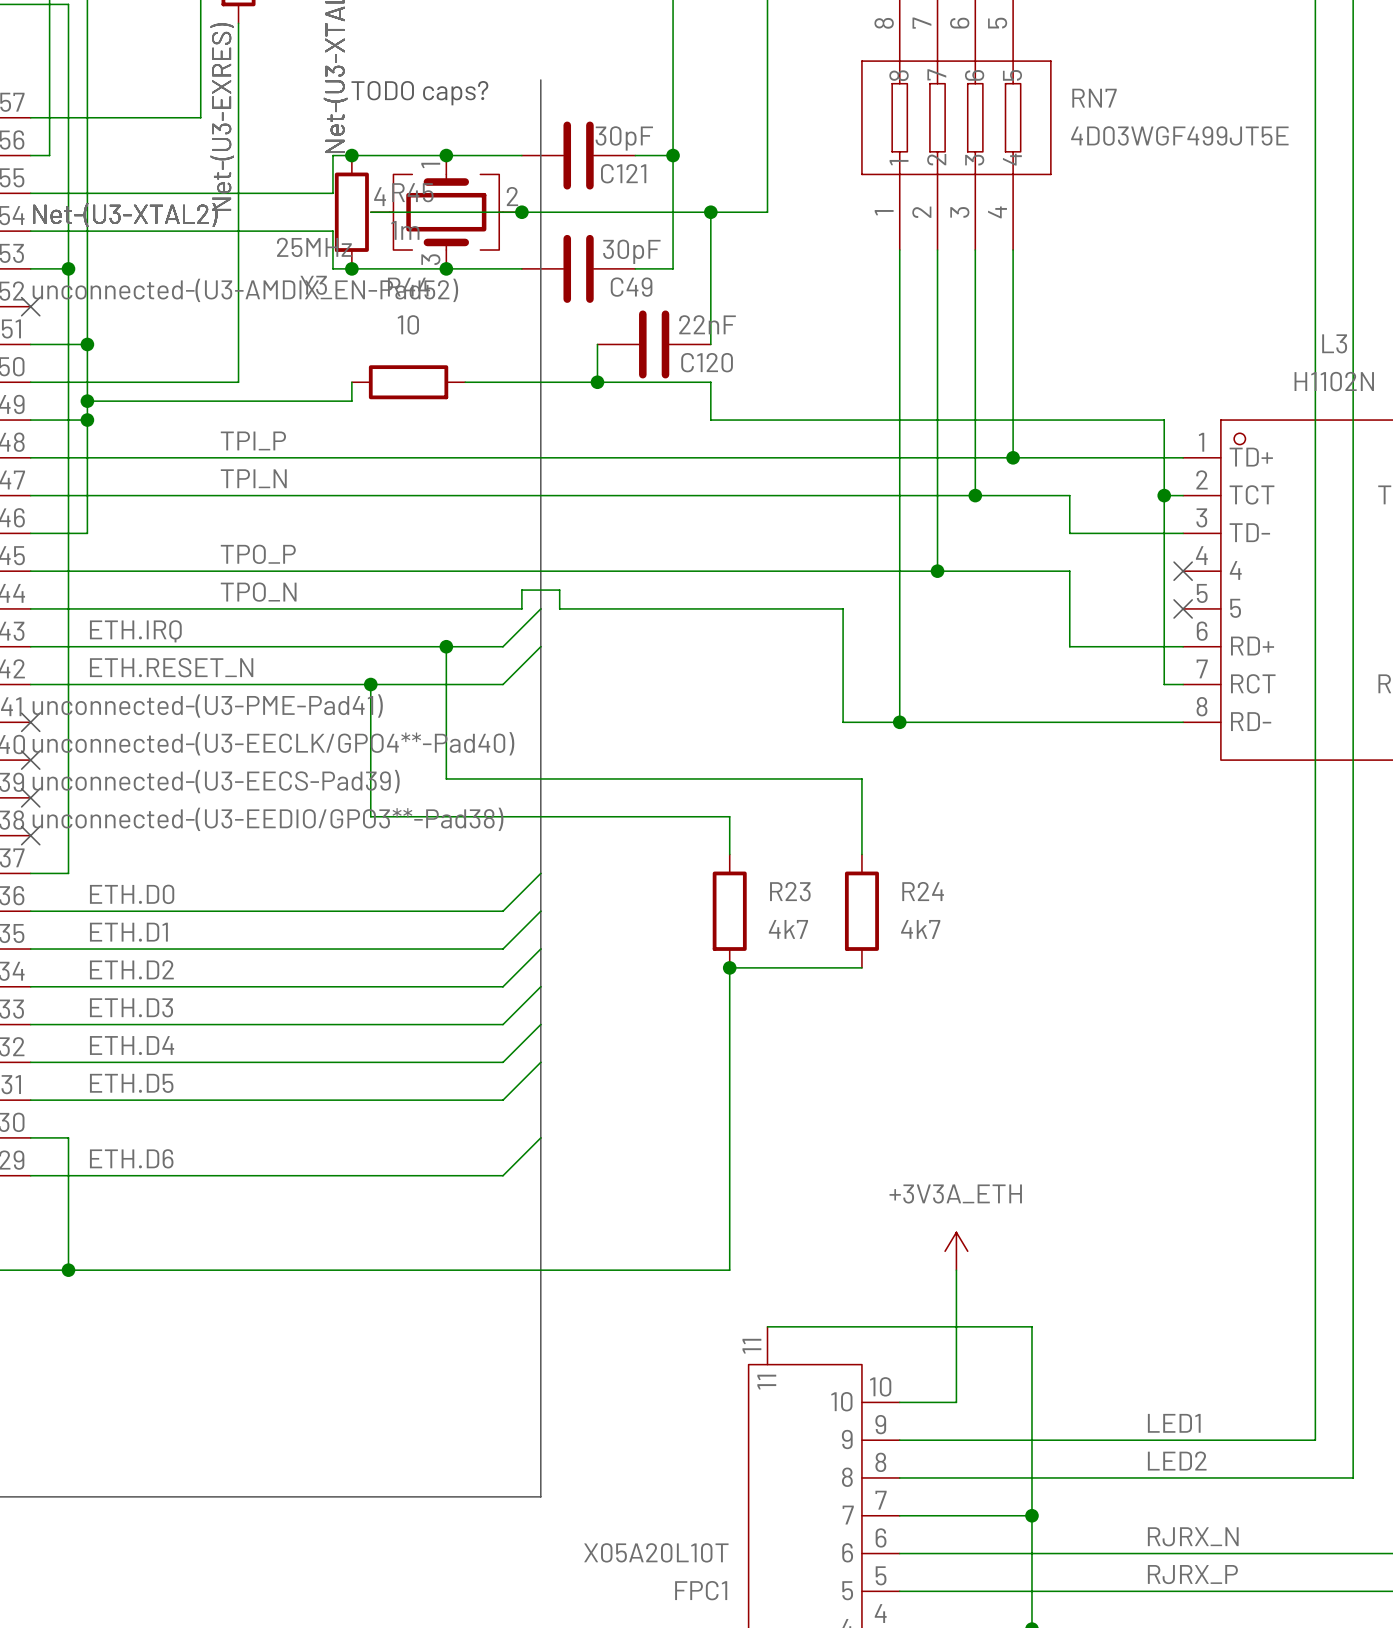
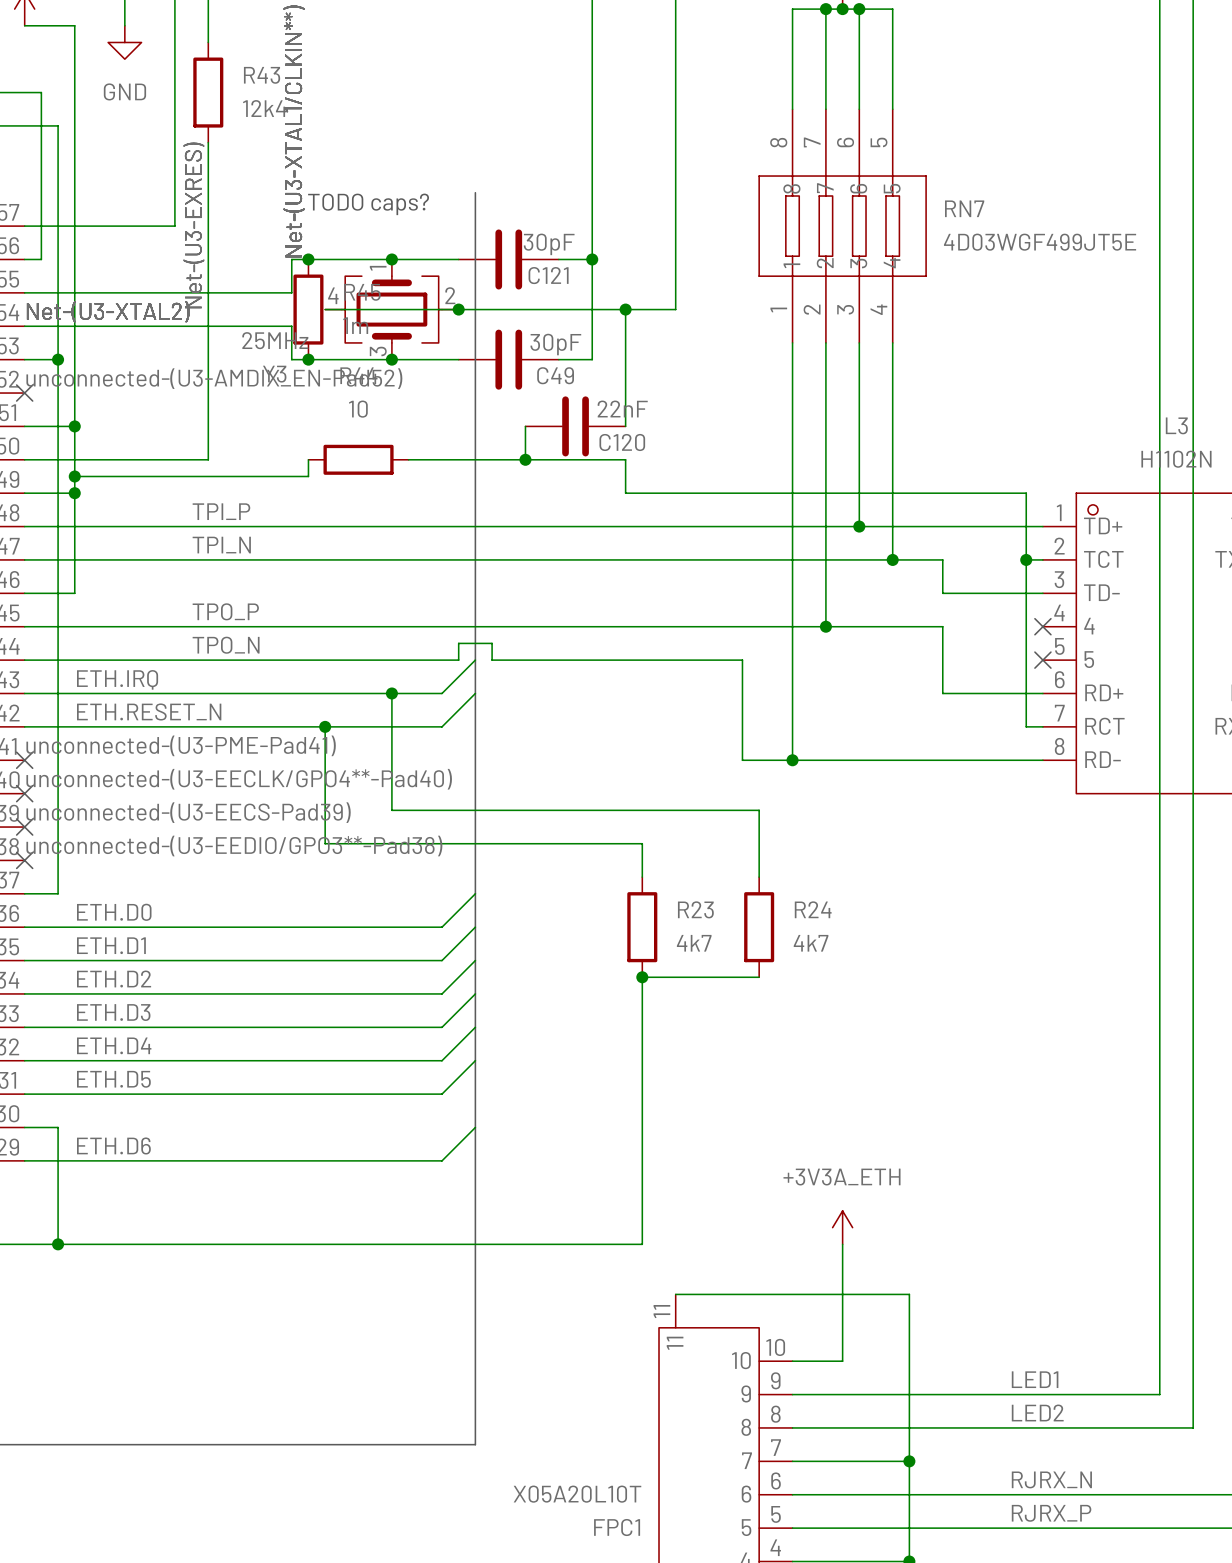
wire: (975, 457) (975, 495) -> (892, 526) (892, 559)
junction: none -> (859, 526)
junction: (1013, 457) -> none
junction: (975, 495) -> none
junction: none -> (892, 559)

